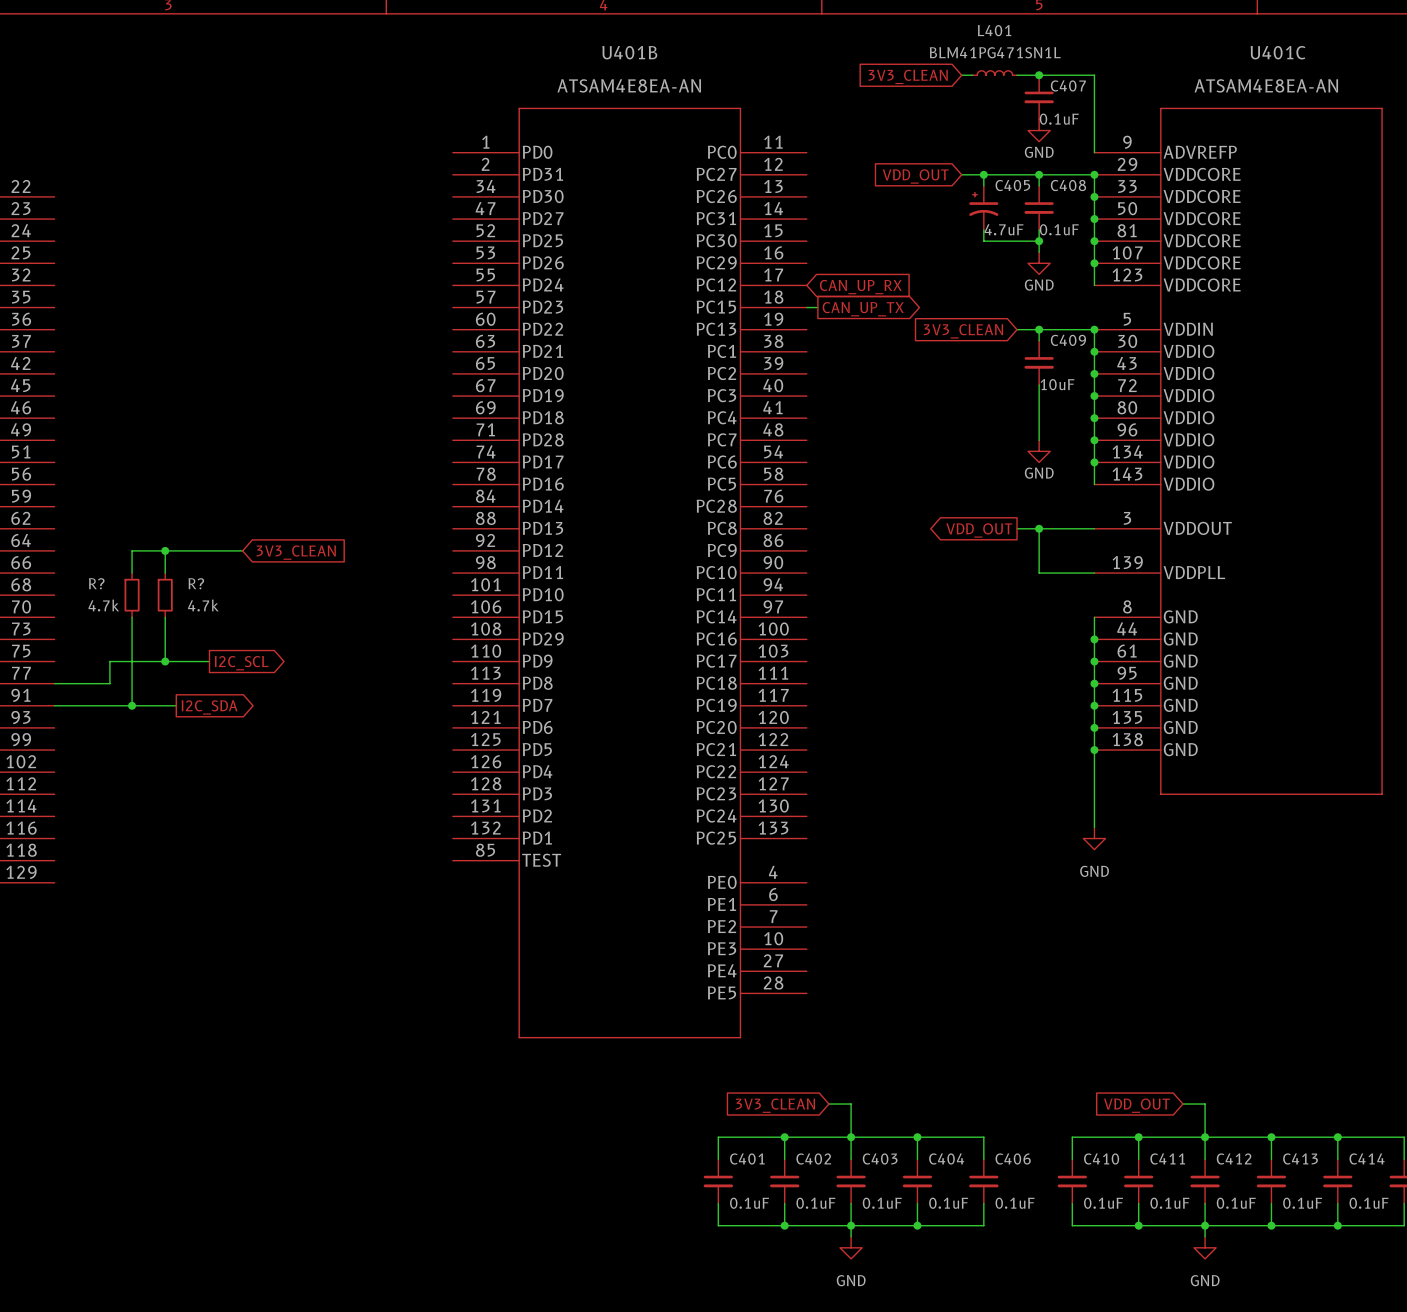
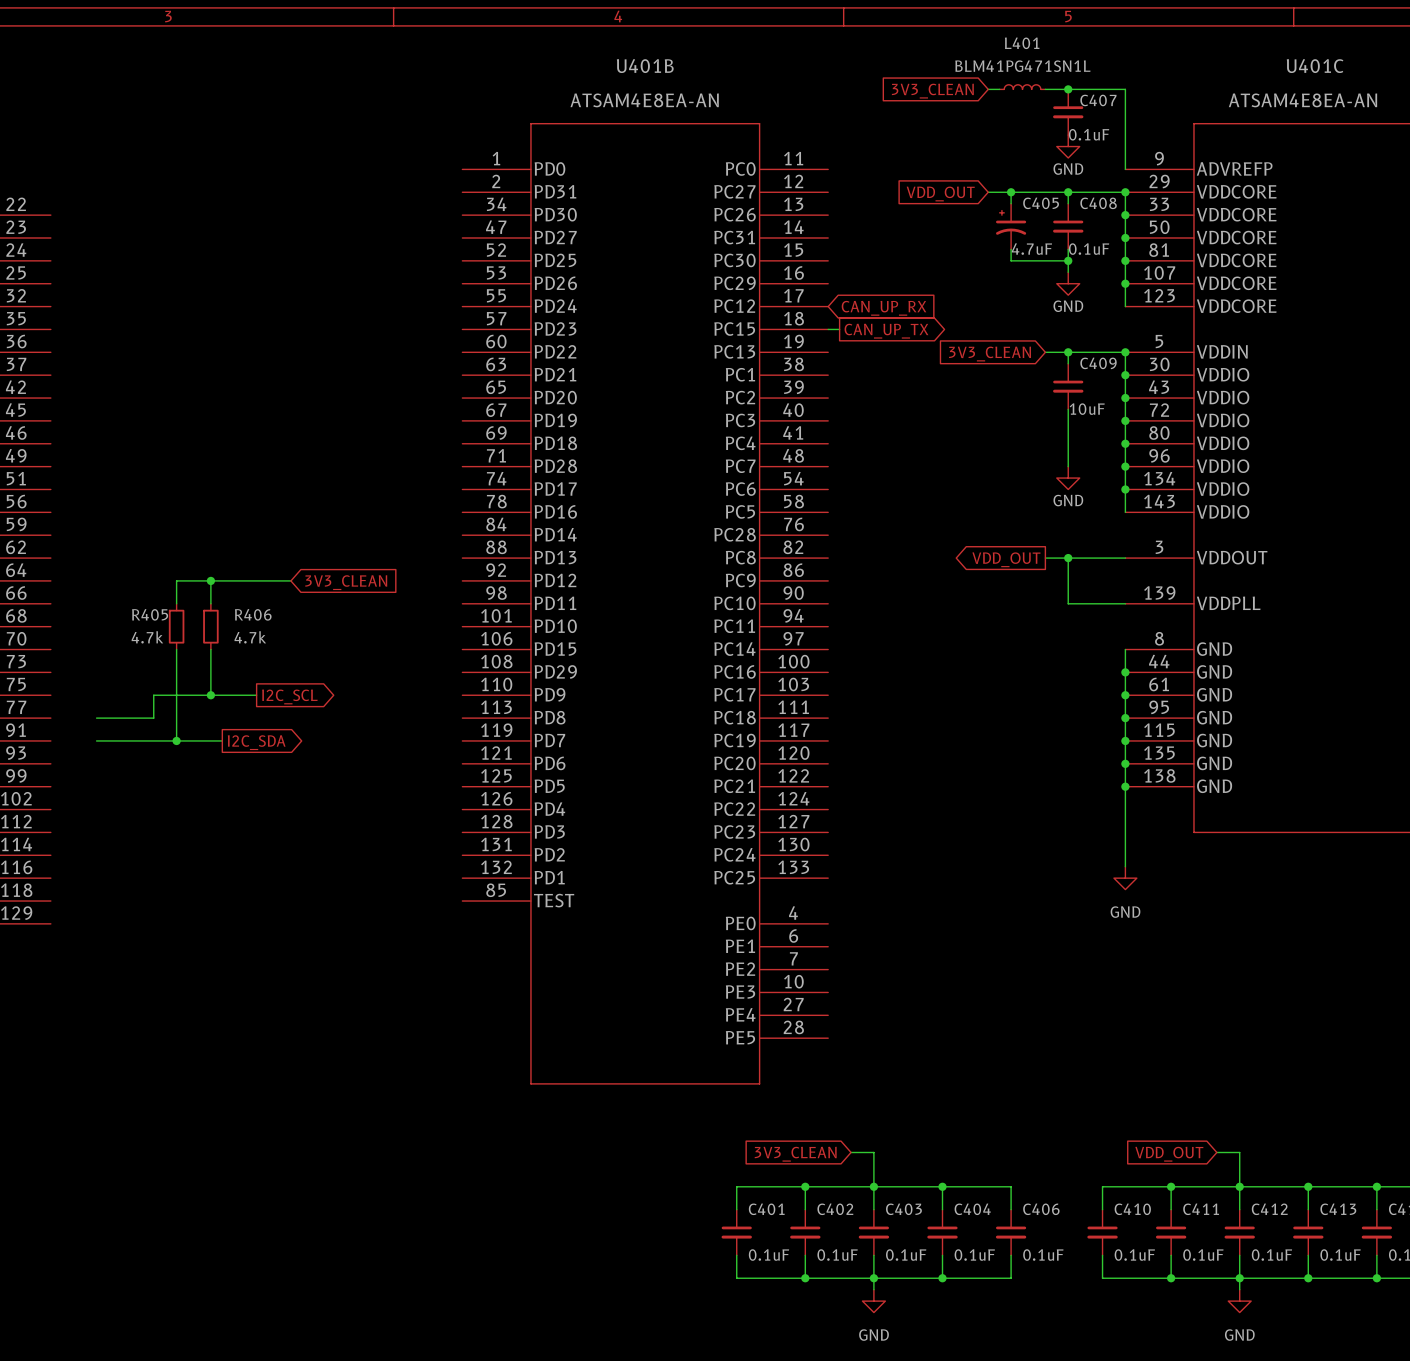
wire: (165, 550) (165, 573) -> (210, 580) (210, 603)
junction position: (165, 550) -> (210, 580)
wire: (176, 550) (132, 550) (132, 573) -> (176, 580) (176, 603)
wire: none -> (245, 580) (290, 580)
global label position: 3V3_CLEAN (296, 552) -> 3V3_CLEAN (346, 582)
R?: 4.7k (132, 595) -> none
R?: 4.7k (165, 595) -> none
R405: none -> 4.7k (176, 626)
R406: none -> 4.7k (210, 626)
wire: (132, 617) (132, 705) -> none
wire: (165, 617) (165, 661) -> none
wire: none -> (176, 649) (176, 740) (222, 740)
wire: none -> (210, 649) (210, 695) (256, 695)
wire: (154, 661) (109, 661) (109, 683) -> (153, 695) (153, 718) (108, 718)
junction: (165, 661) -> none
junction: none -> (210, 695)
global label position: I2C_SCL (241, 663) -> I2C_SCL (289, 696)
wire: (54, 683) (98, 683) -> none
wire: (54, 705) (98, 705) -> none
junction: (132, 705) -> none
junction: none -> (176, 740)
global label position: I2C_SDA (209, 707) -> I2C_SDA (256, 742)

